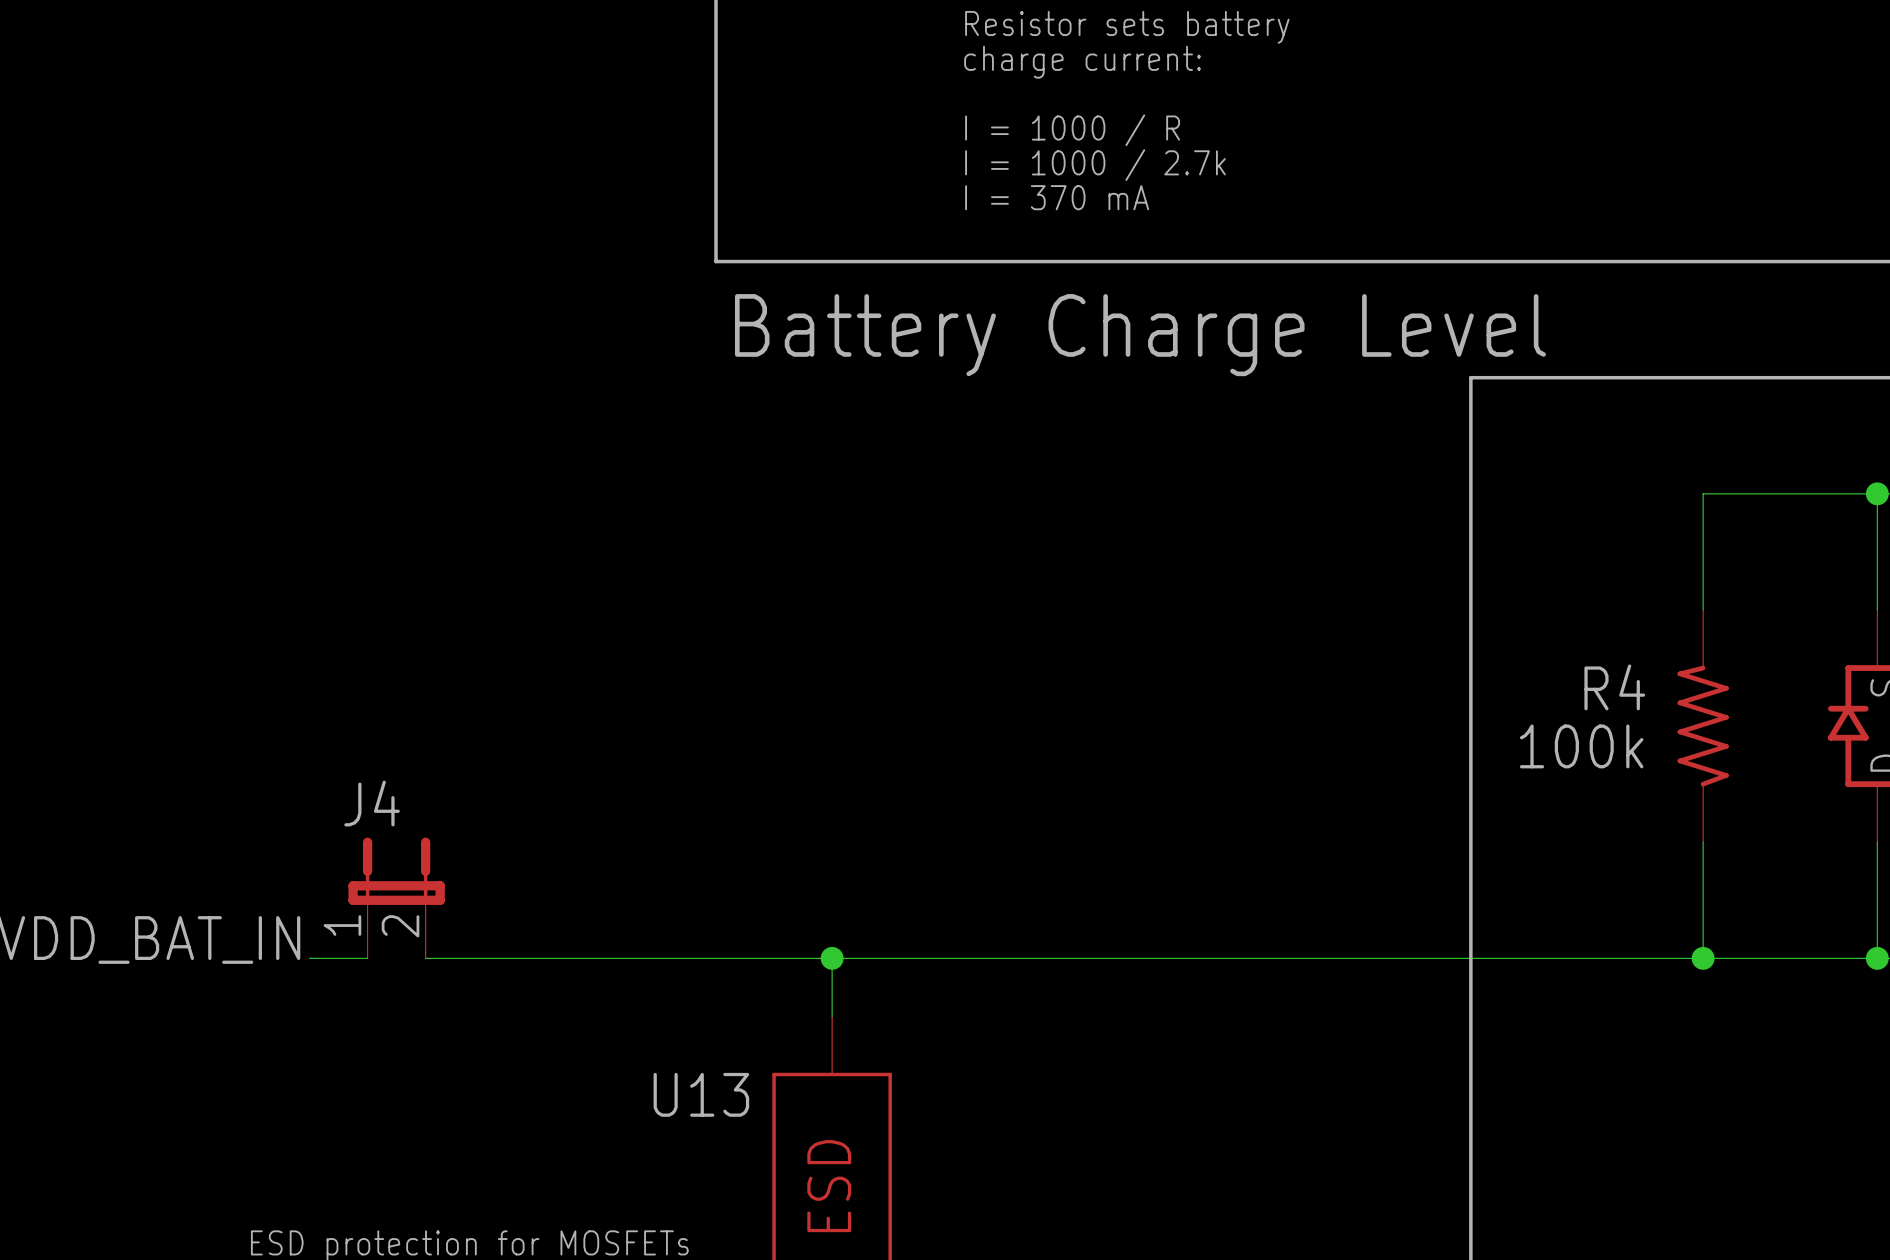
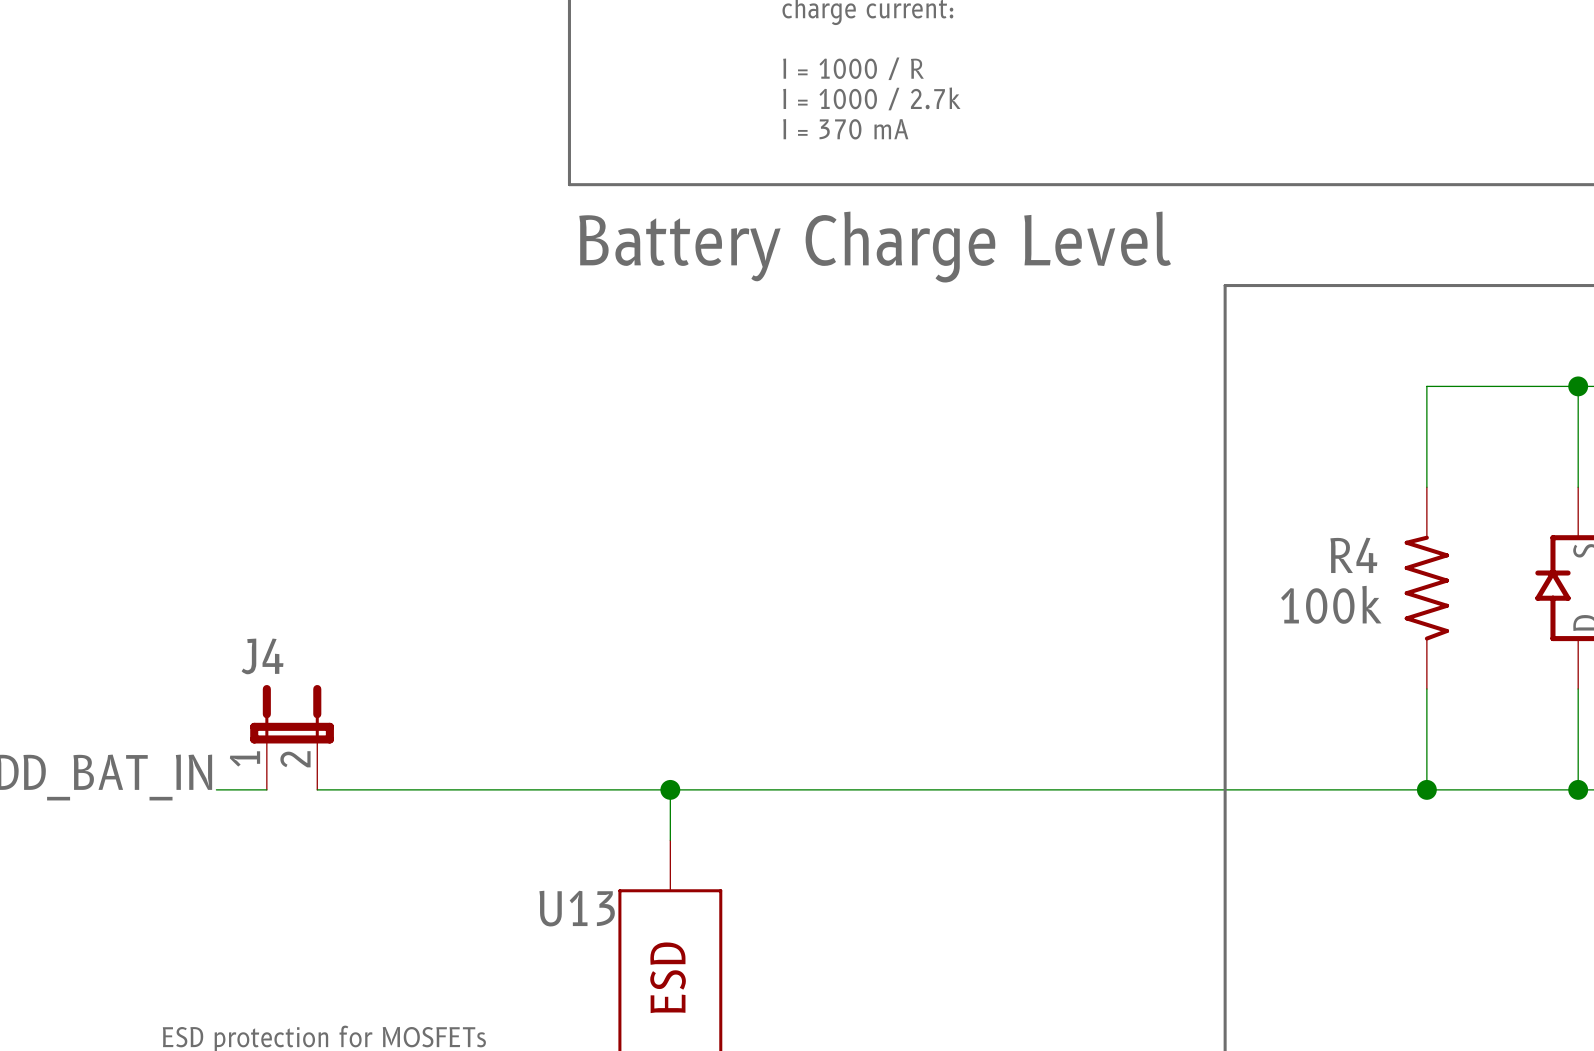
U13 name position: U13 (701, 1094) -> U13 (577, 908)

